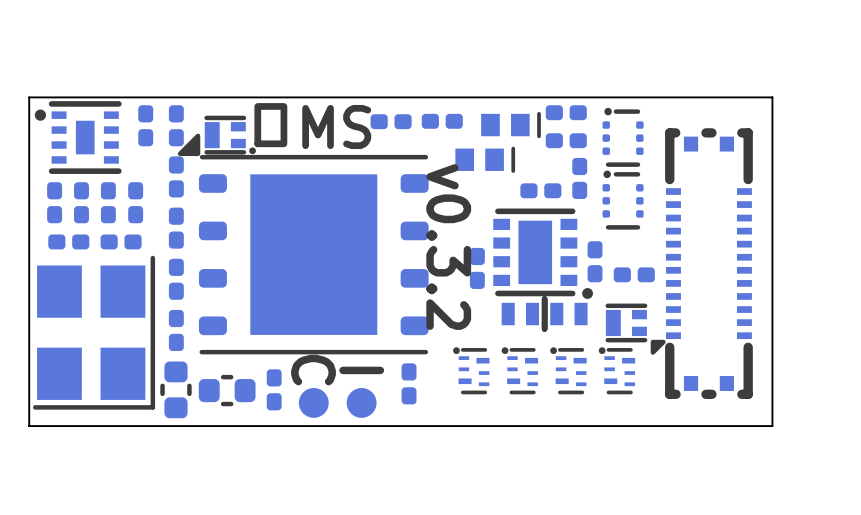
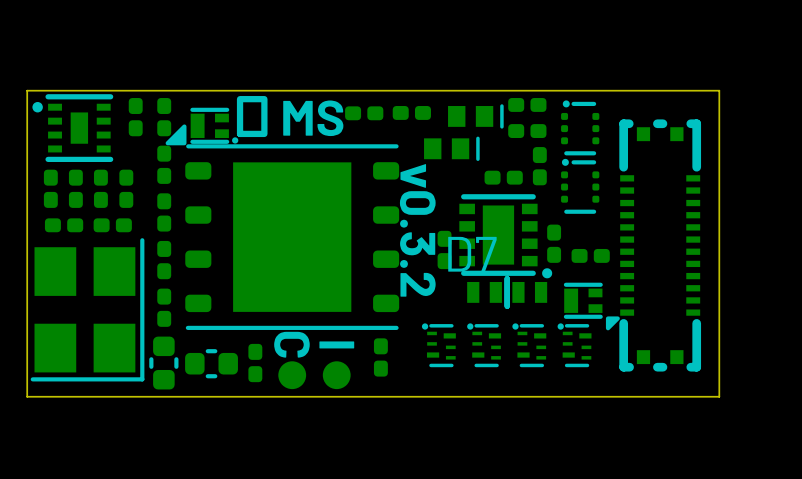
D7 name: none -> D7 (472, 254)

